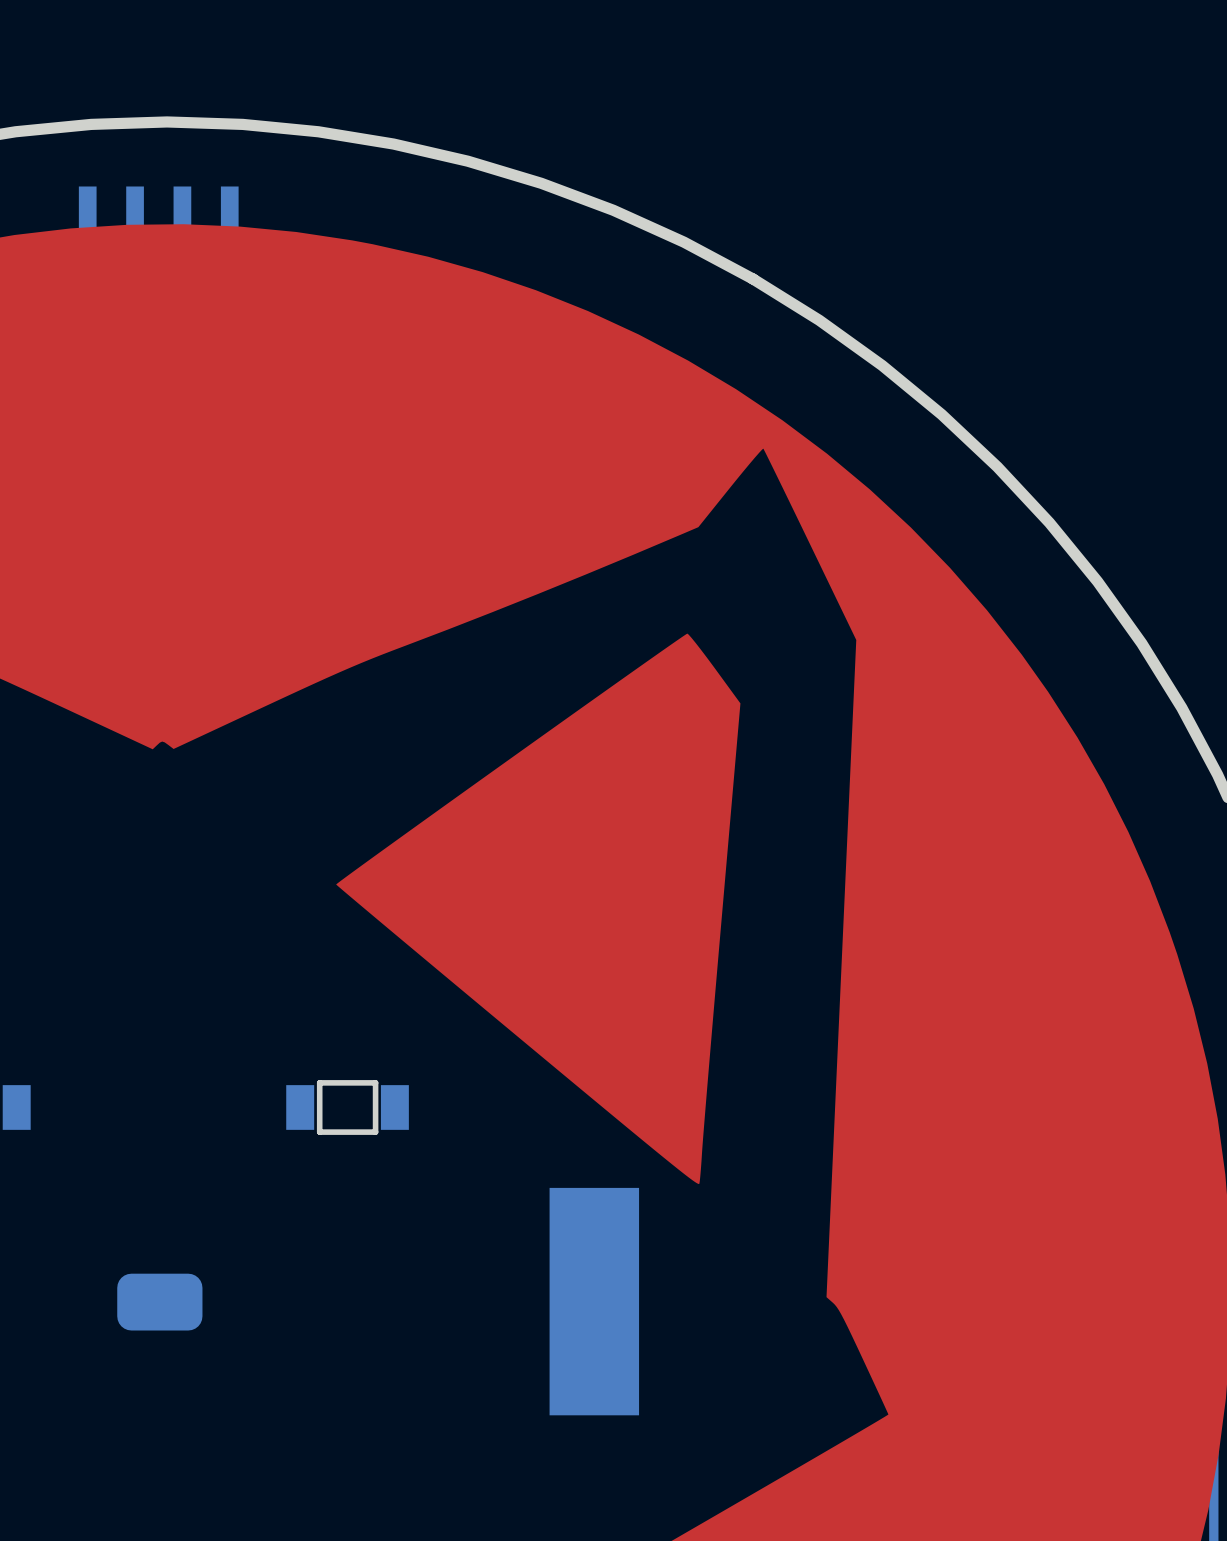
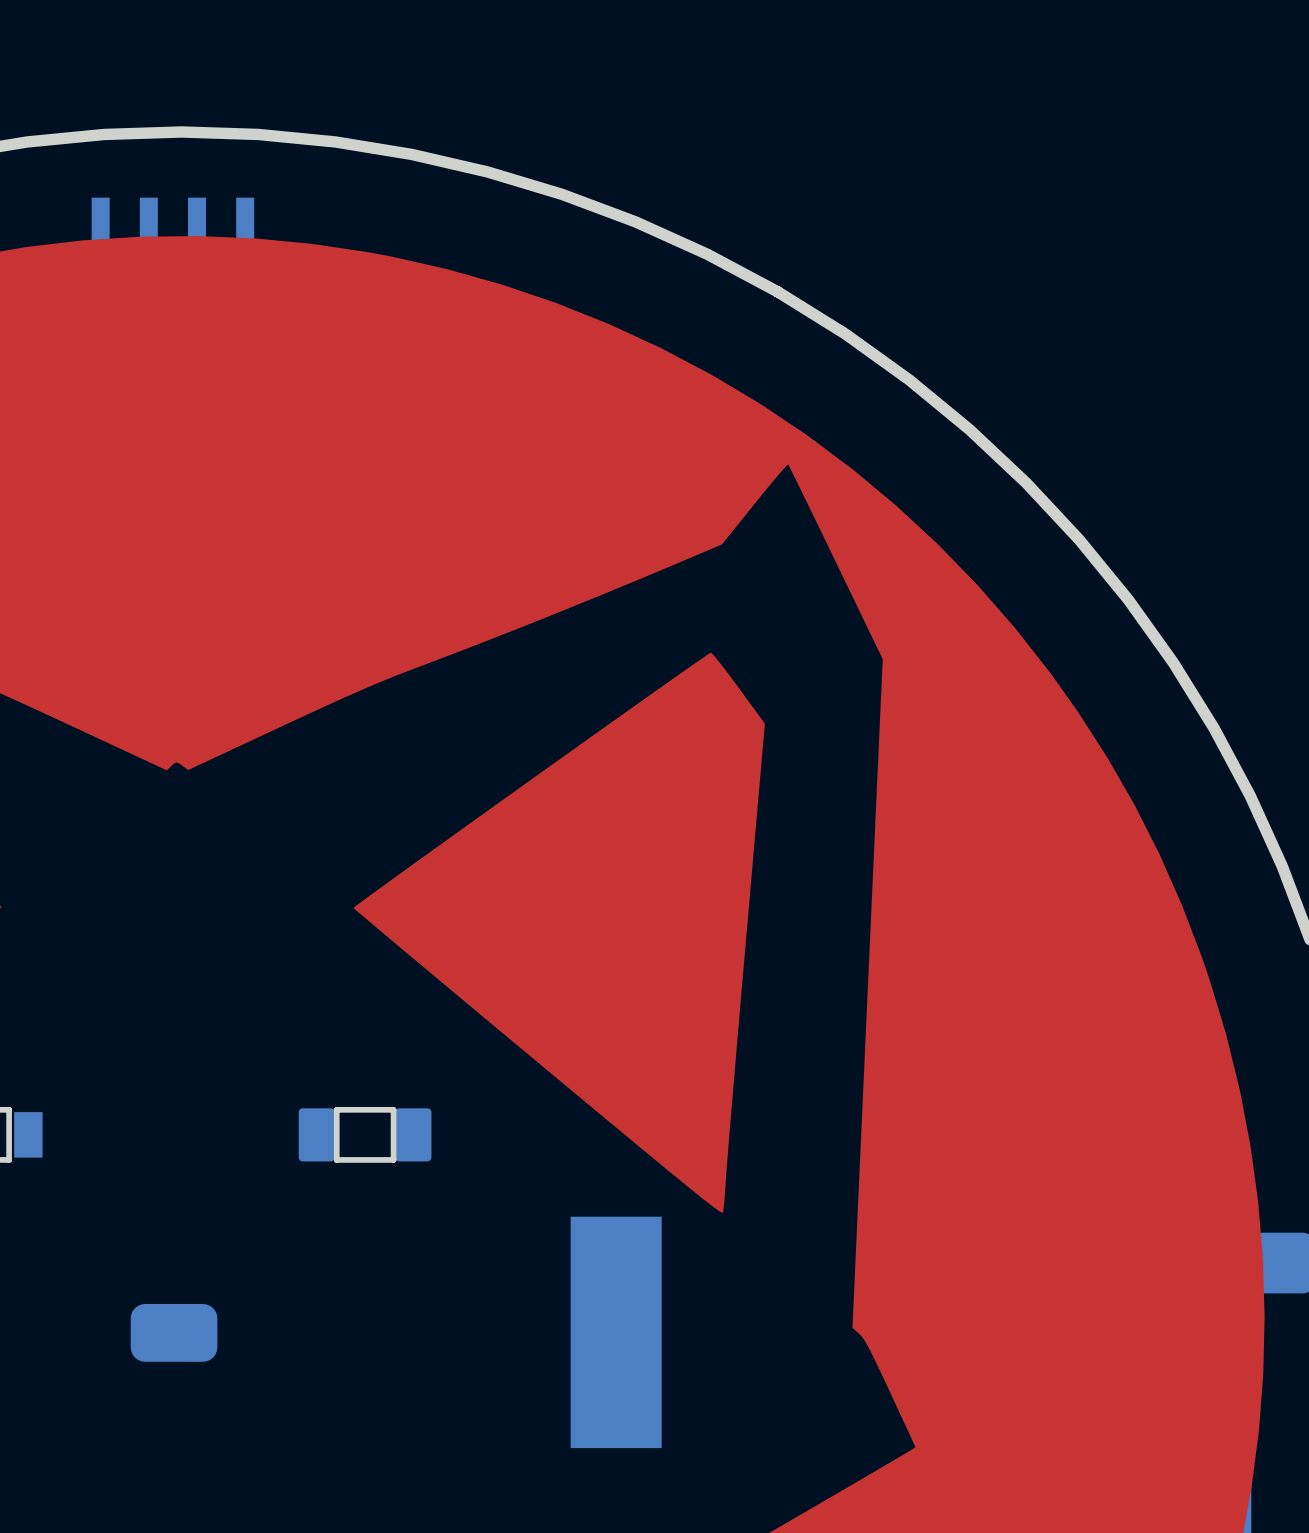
drawing: none -> [298, 1108, 432, 1162]
part: (347, 1107) -> none

